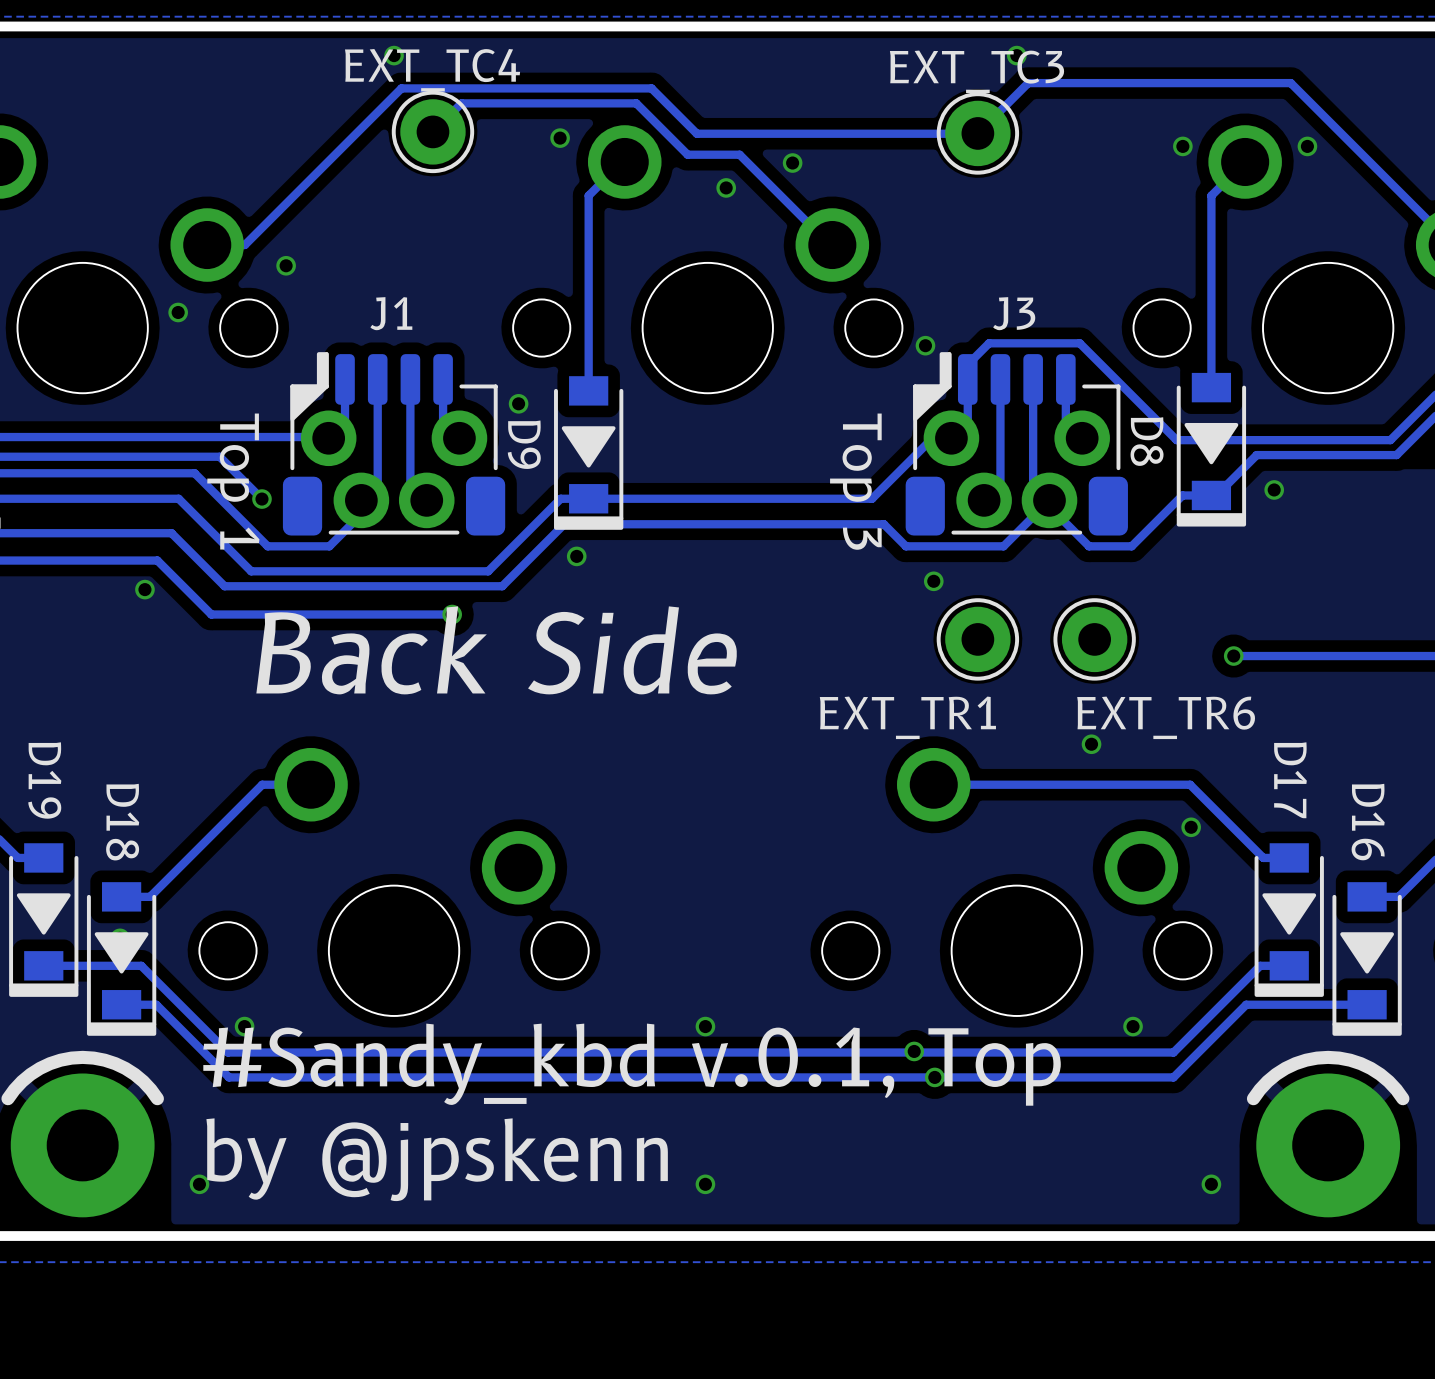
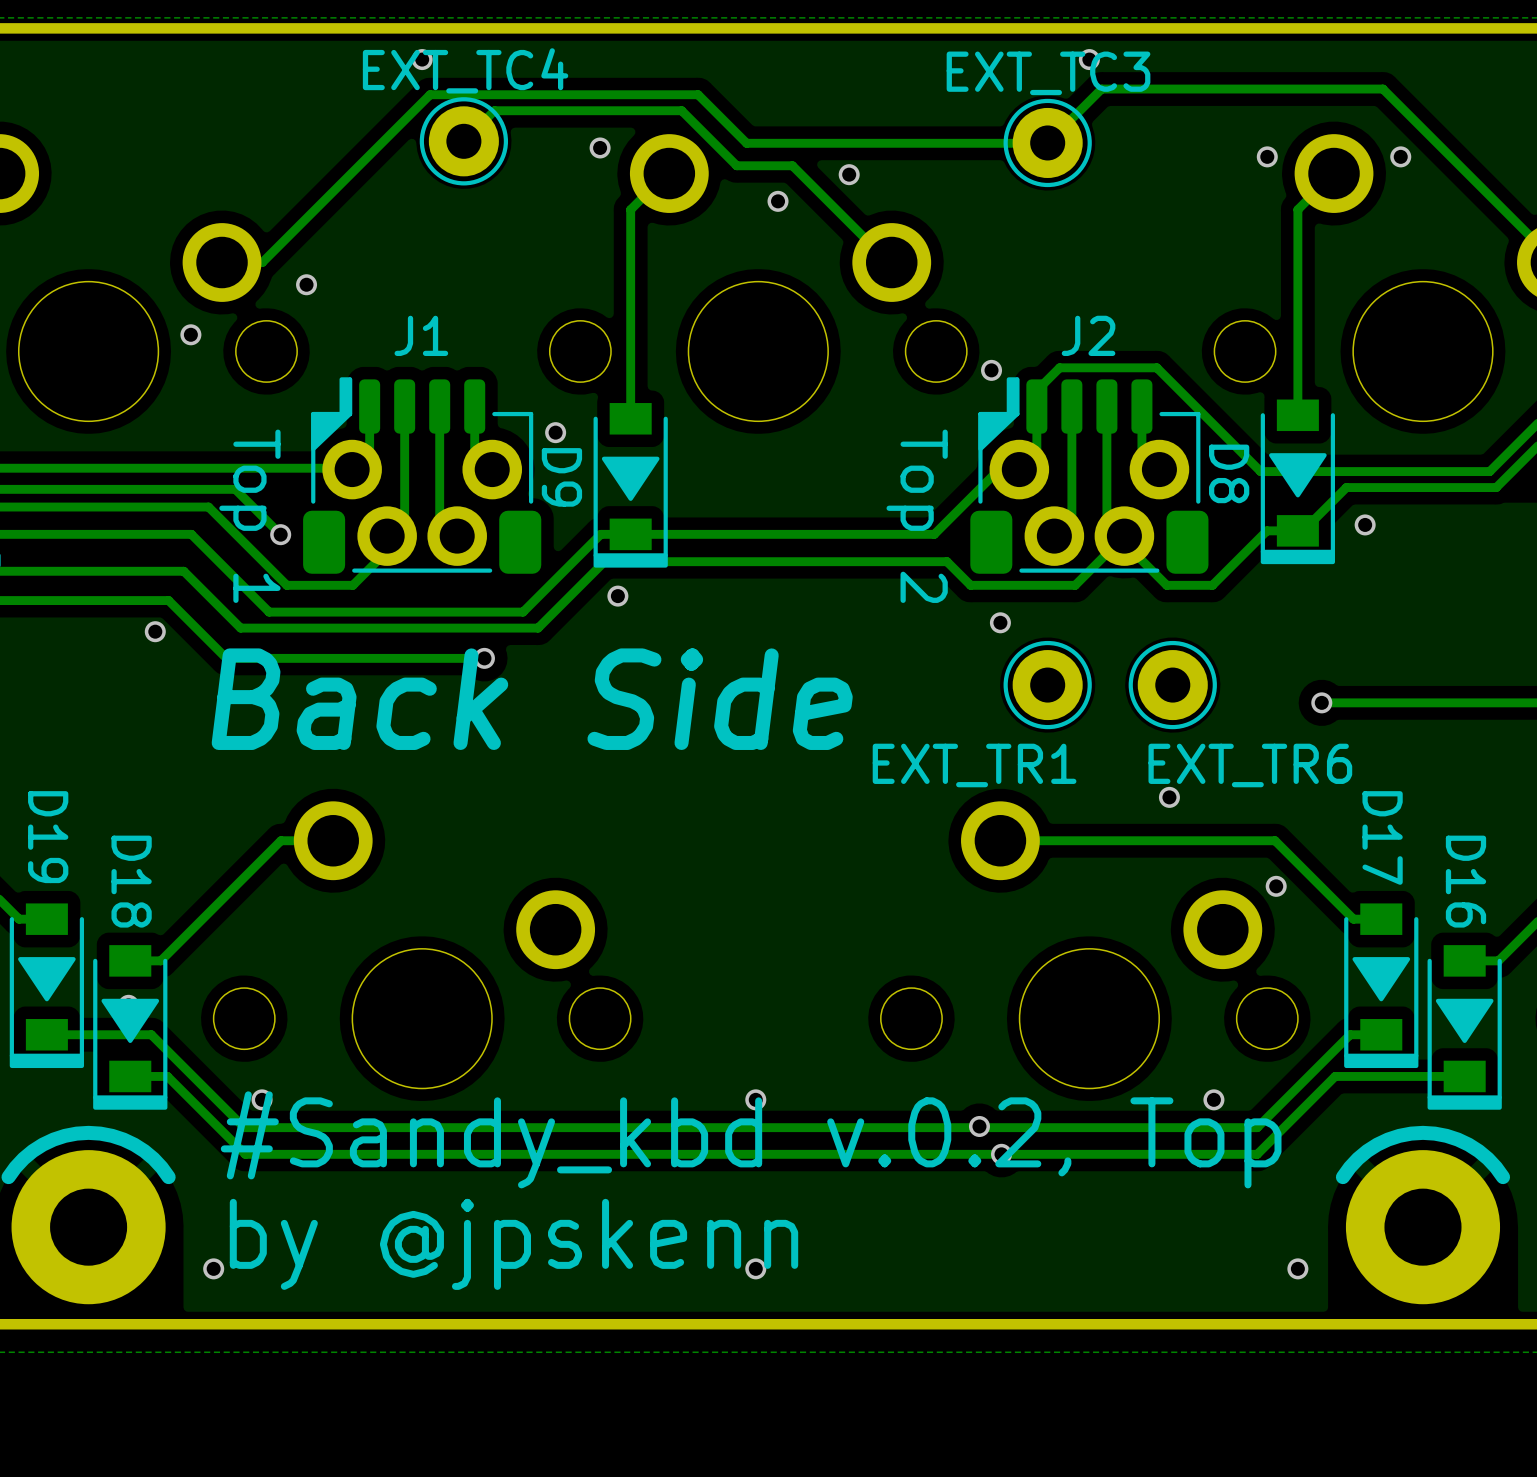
J3 name: J3 (1014, 313) -> J2 (1088, 335)
text: Top 3 (855, 481) -> Top 2 (917, 516)
text: #Sandy_kbd v.0.1, Top (632, 1064) -> #Sandy_kbd v.0.2, Top (751, 1139)

